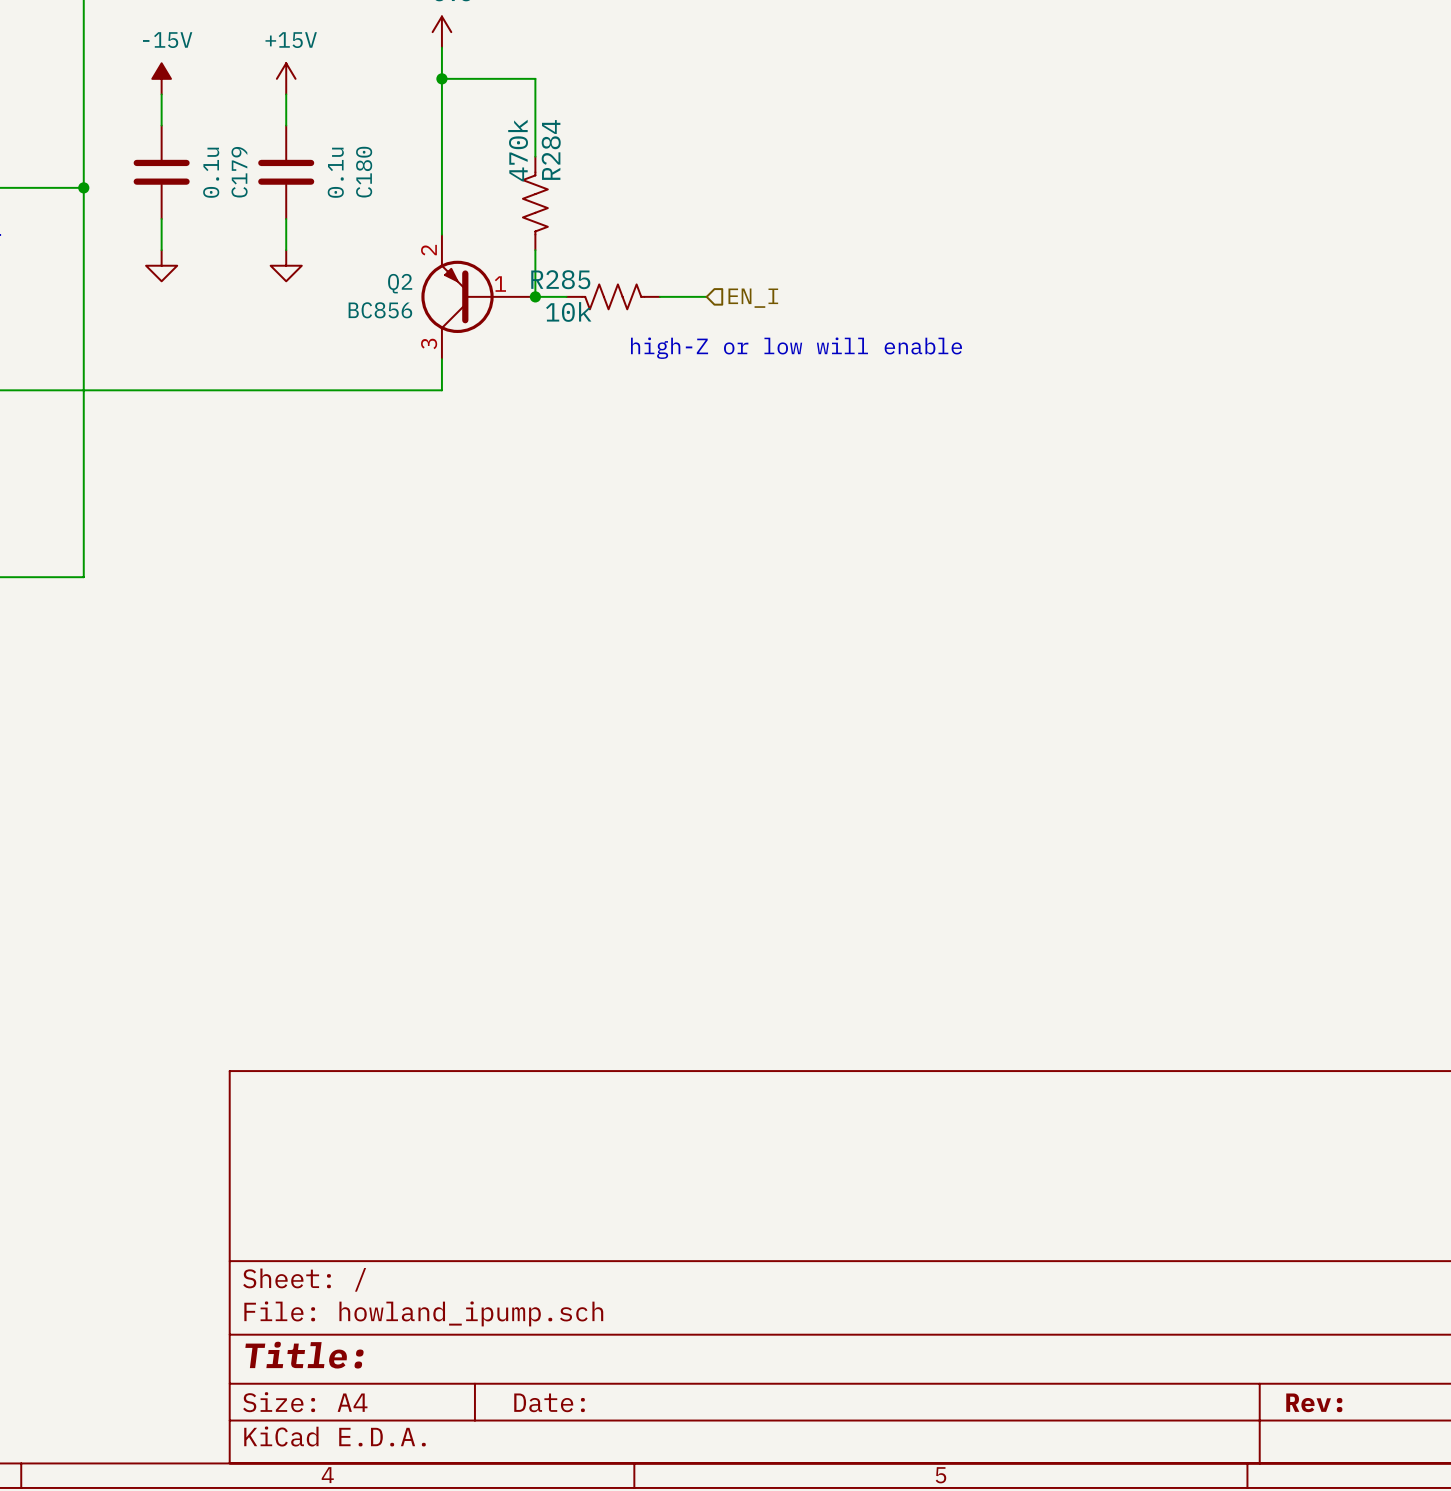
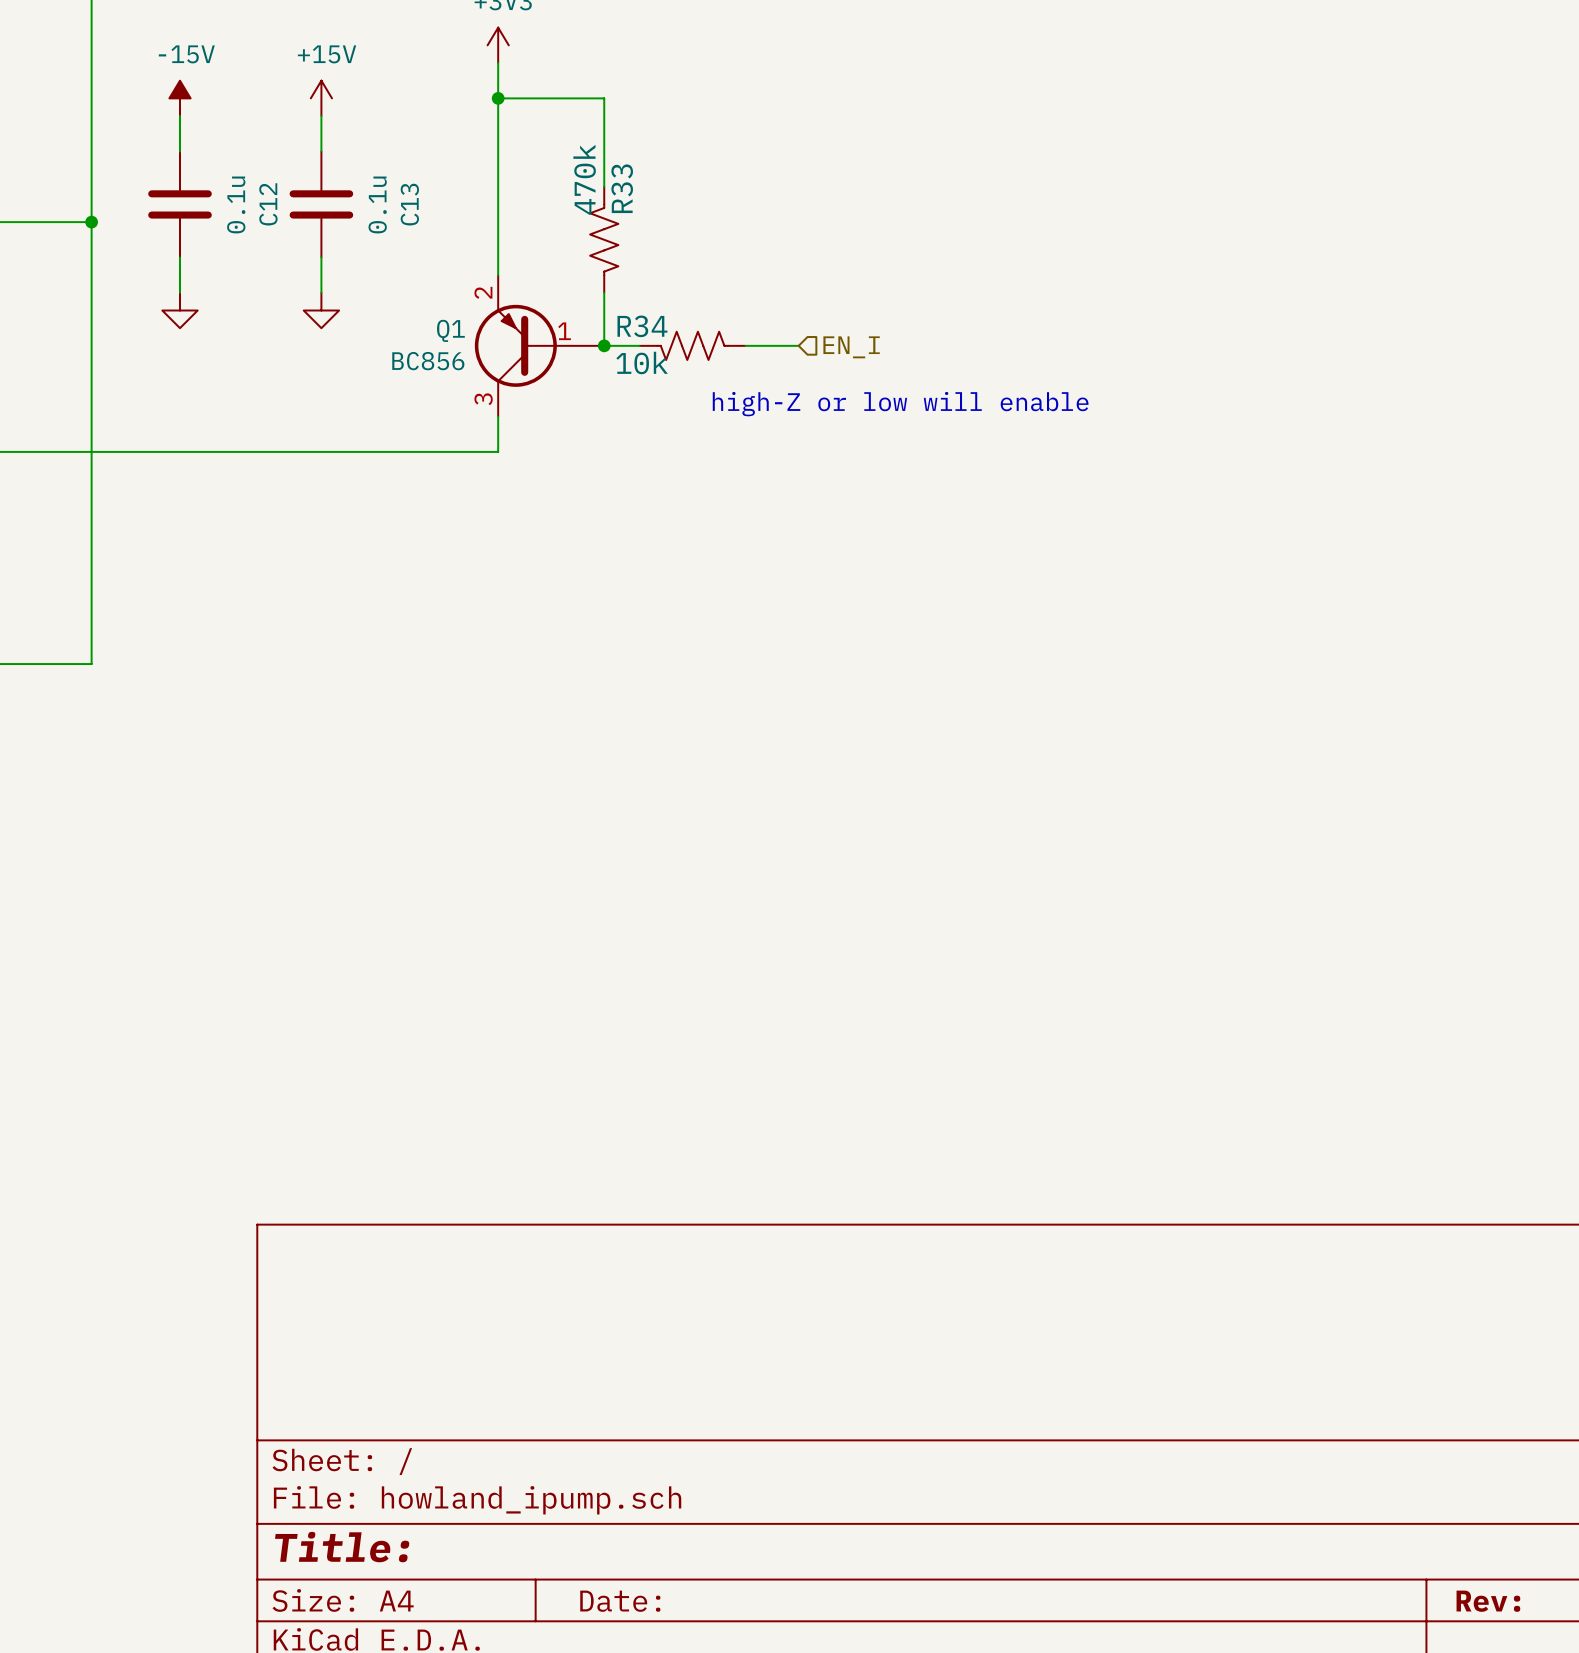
R284 name: R284 (551, 149) -> R33 (622, 188)
C179 name: C179 (239, 172) -> C12 (268, 204)
C180 name: C180 (364, 172) -> C13 (409, 204)
R285 name: R285 (560, 279) -> R34 (642, 326)
Q2 name: Q2 (400, 283) -> Q1 (450, 330)

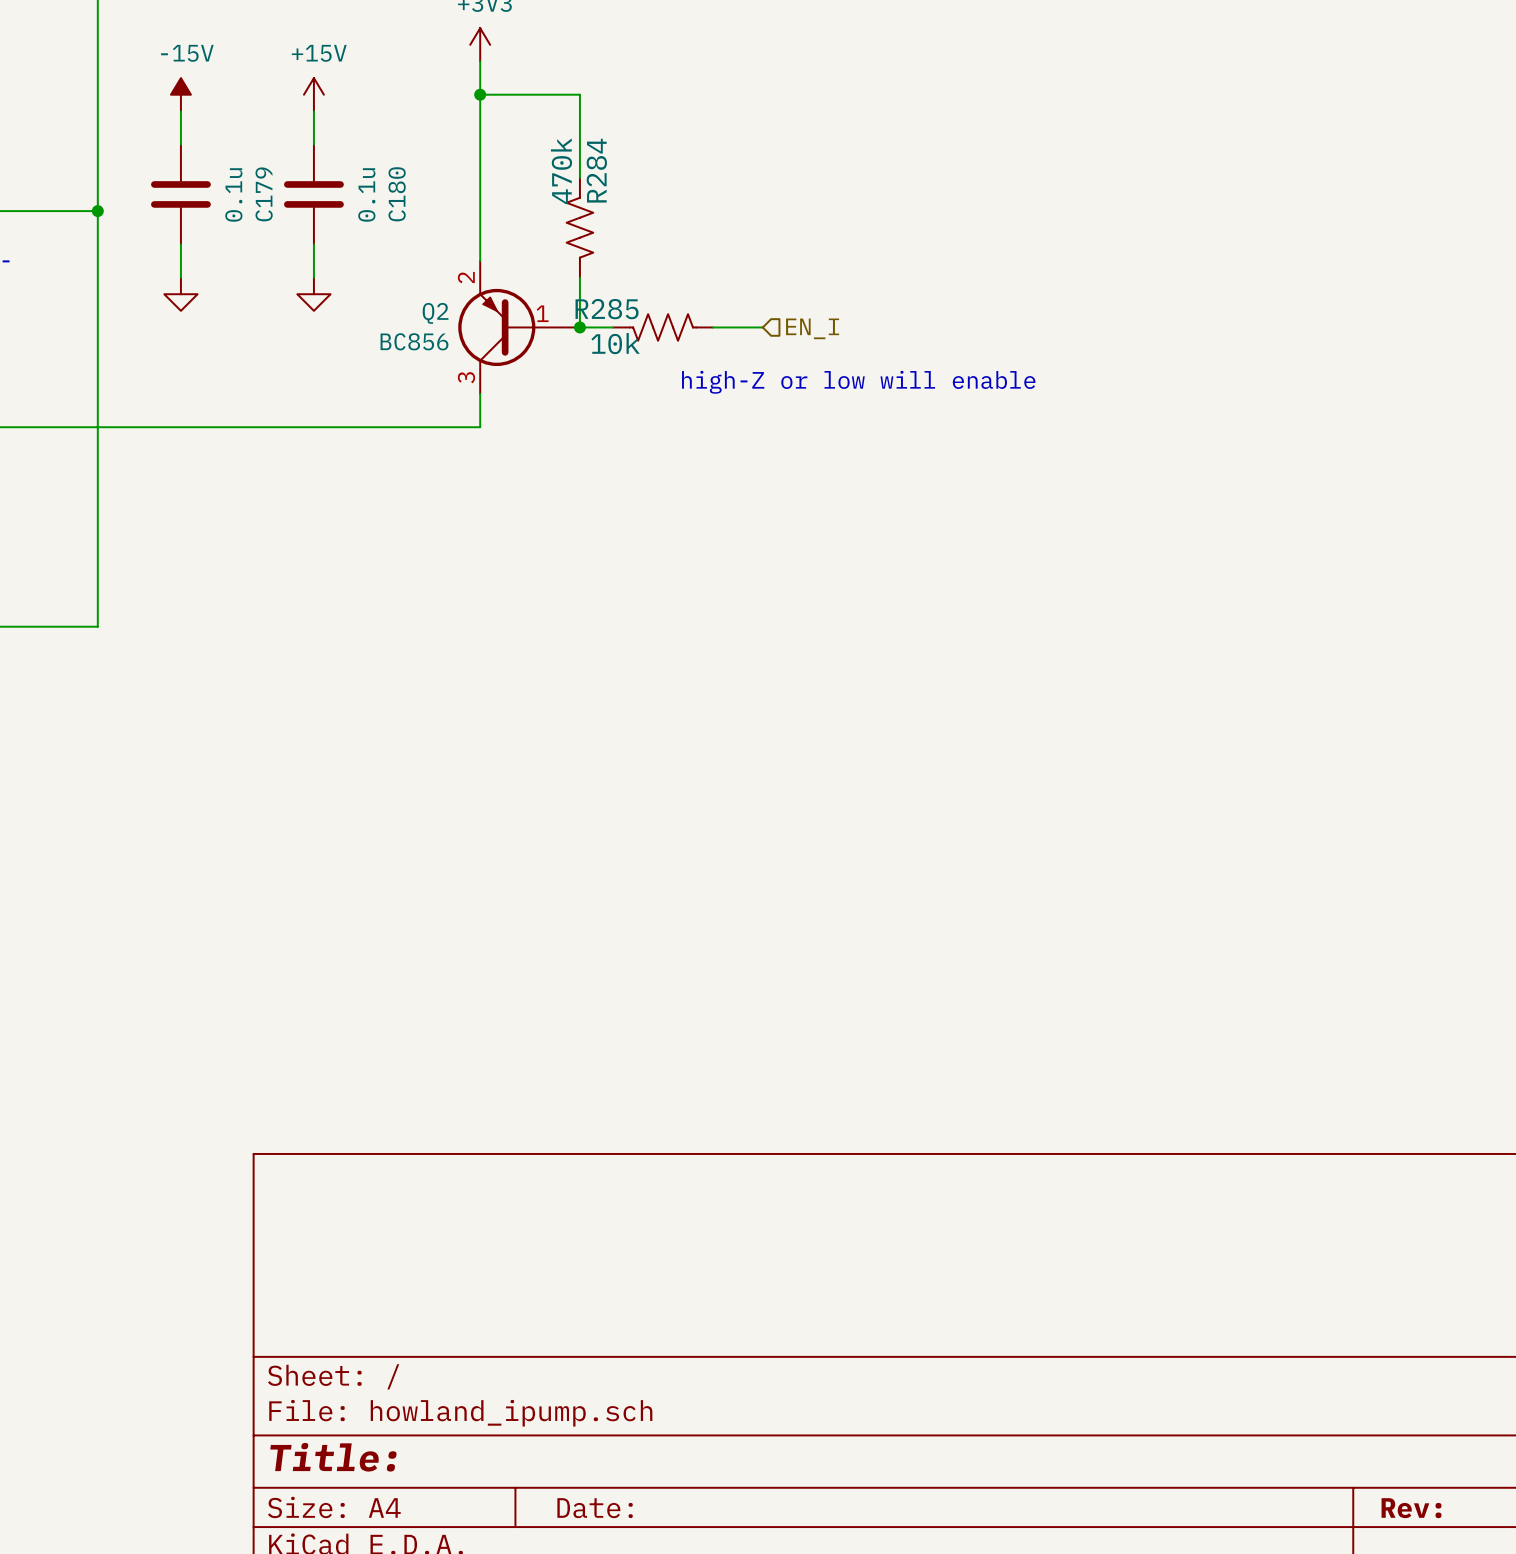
R33 name: R33 (622, 188) -> R284 (596, 170)
C12 name: C12 (268, 204) -> C179 (264, 194)
C13 name: C13 (409, 204) -> C180 (397, 194)
R34 name: R34 (642, 326) -> R285 (607, 309)
Q1 name: Q1 (450, 330) -> Q2 (435, 313)

